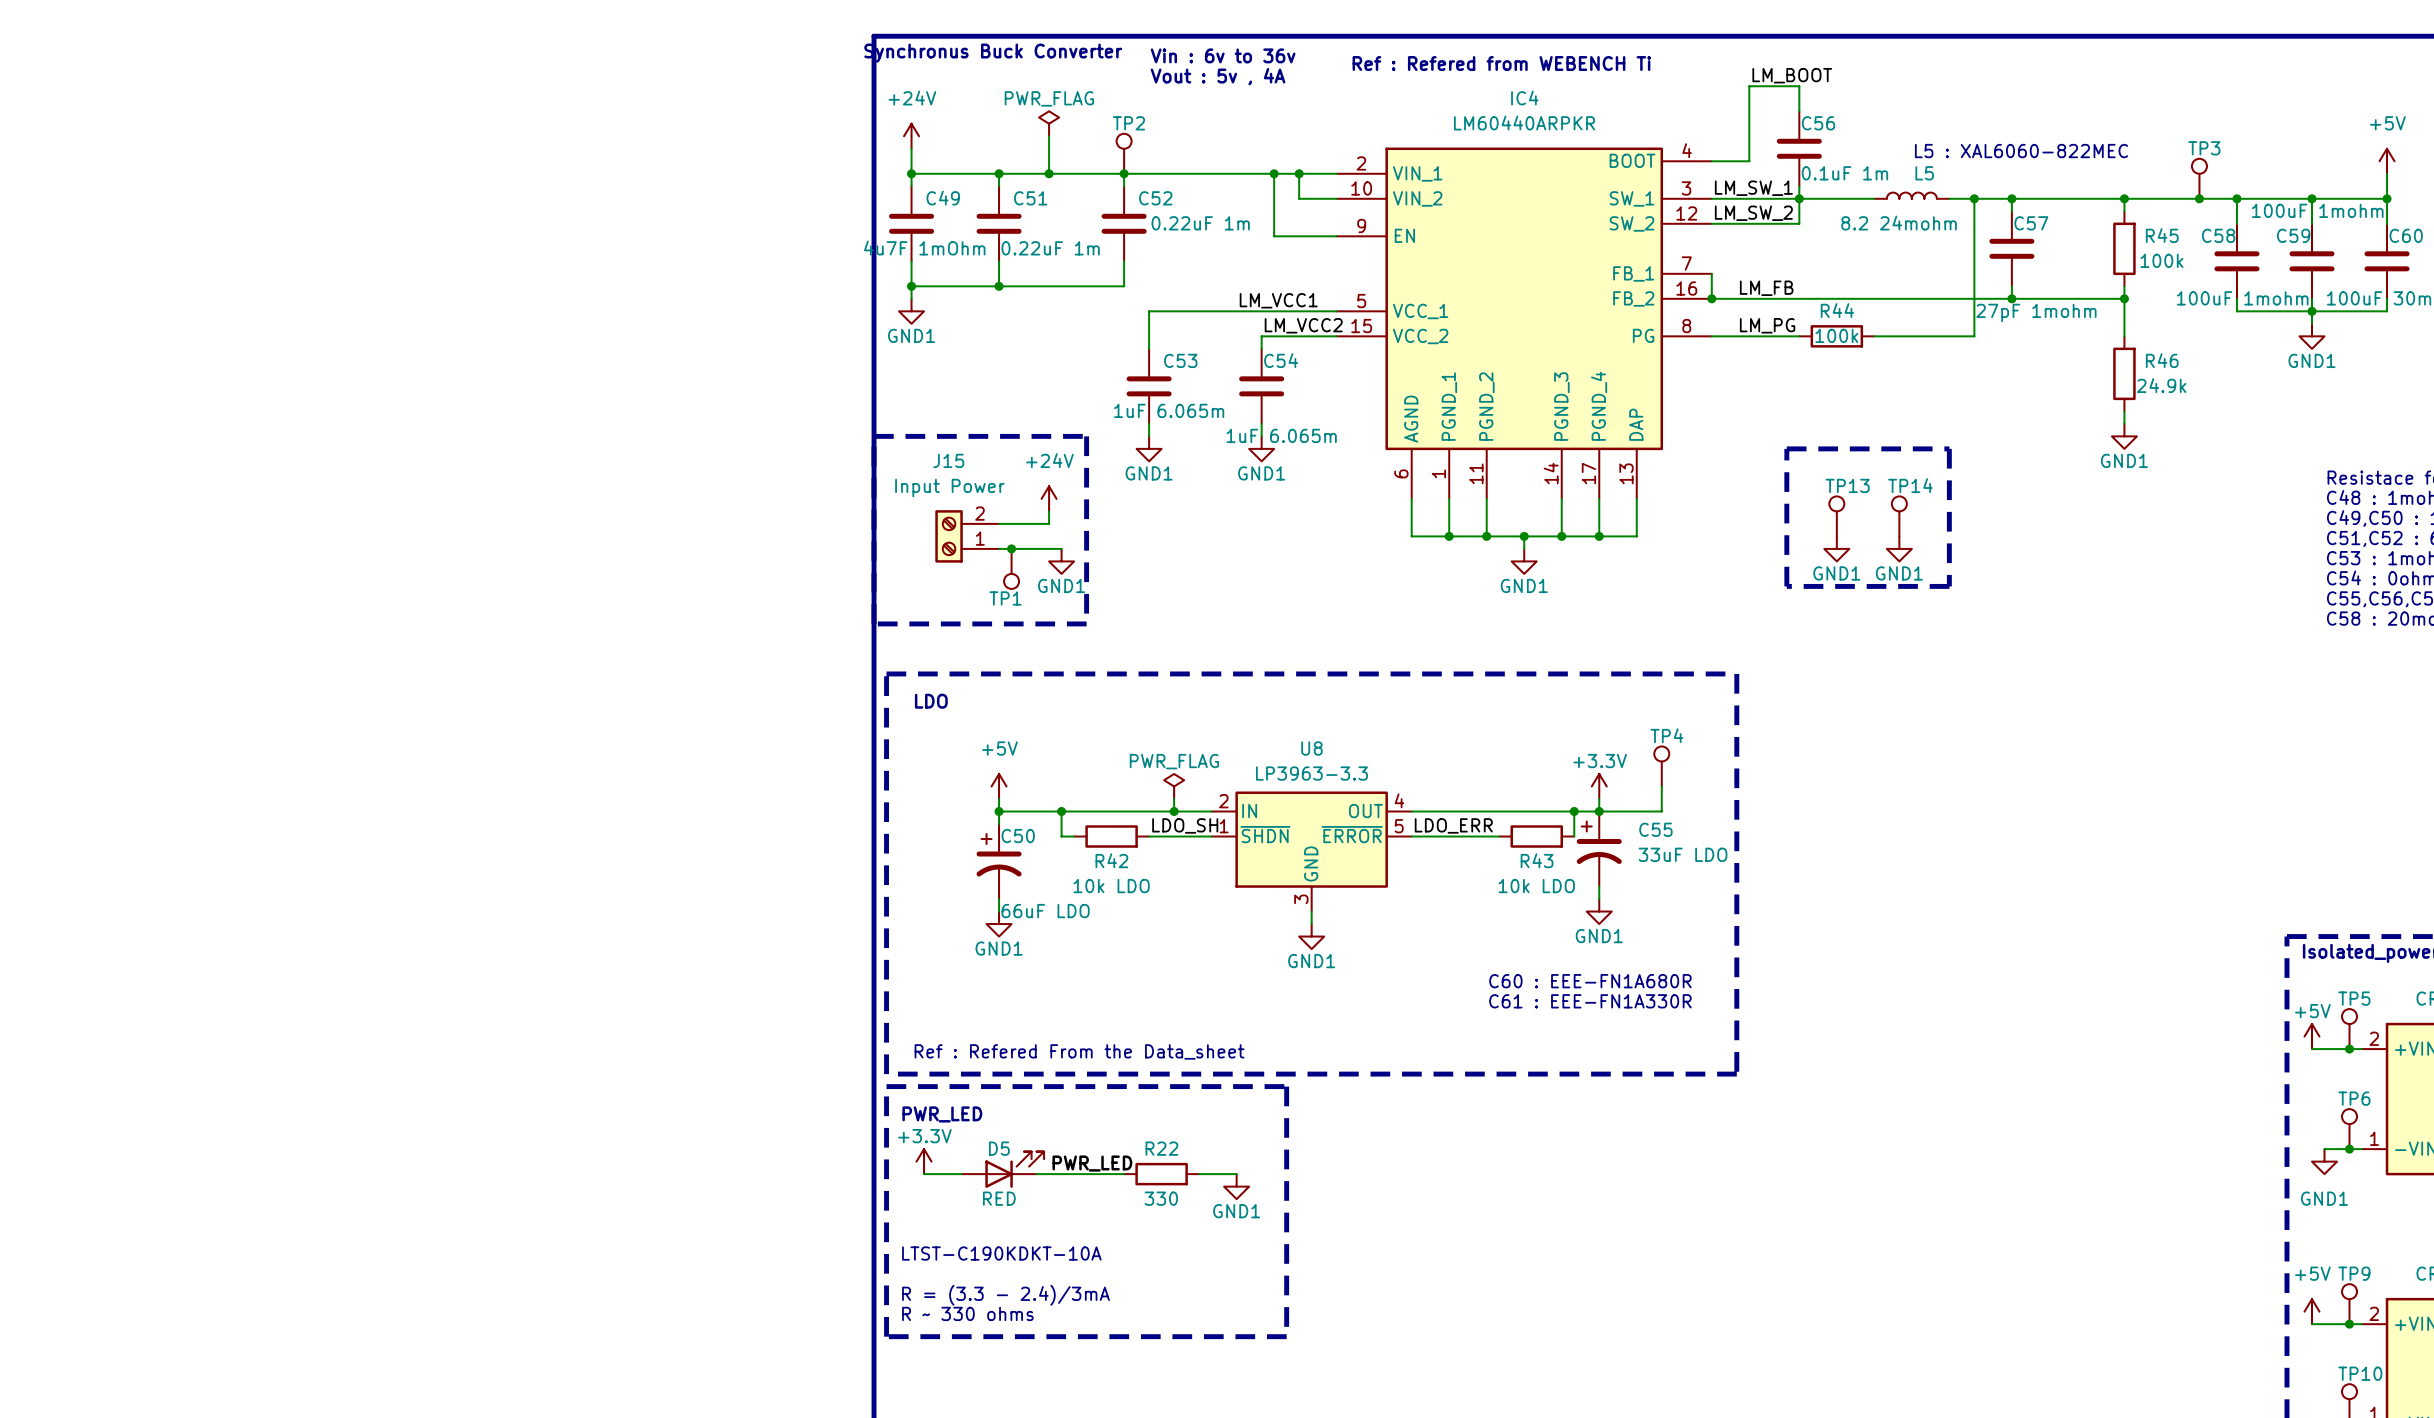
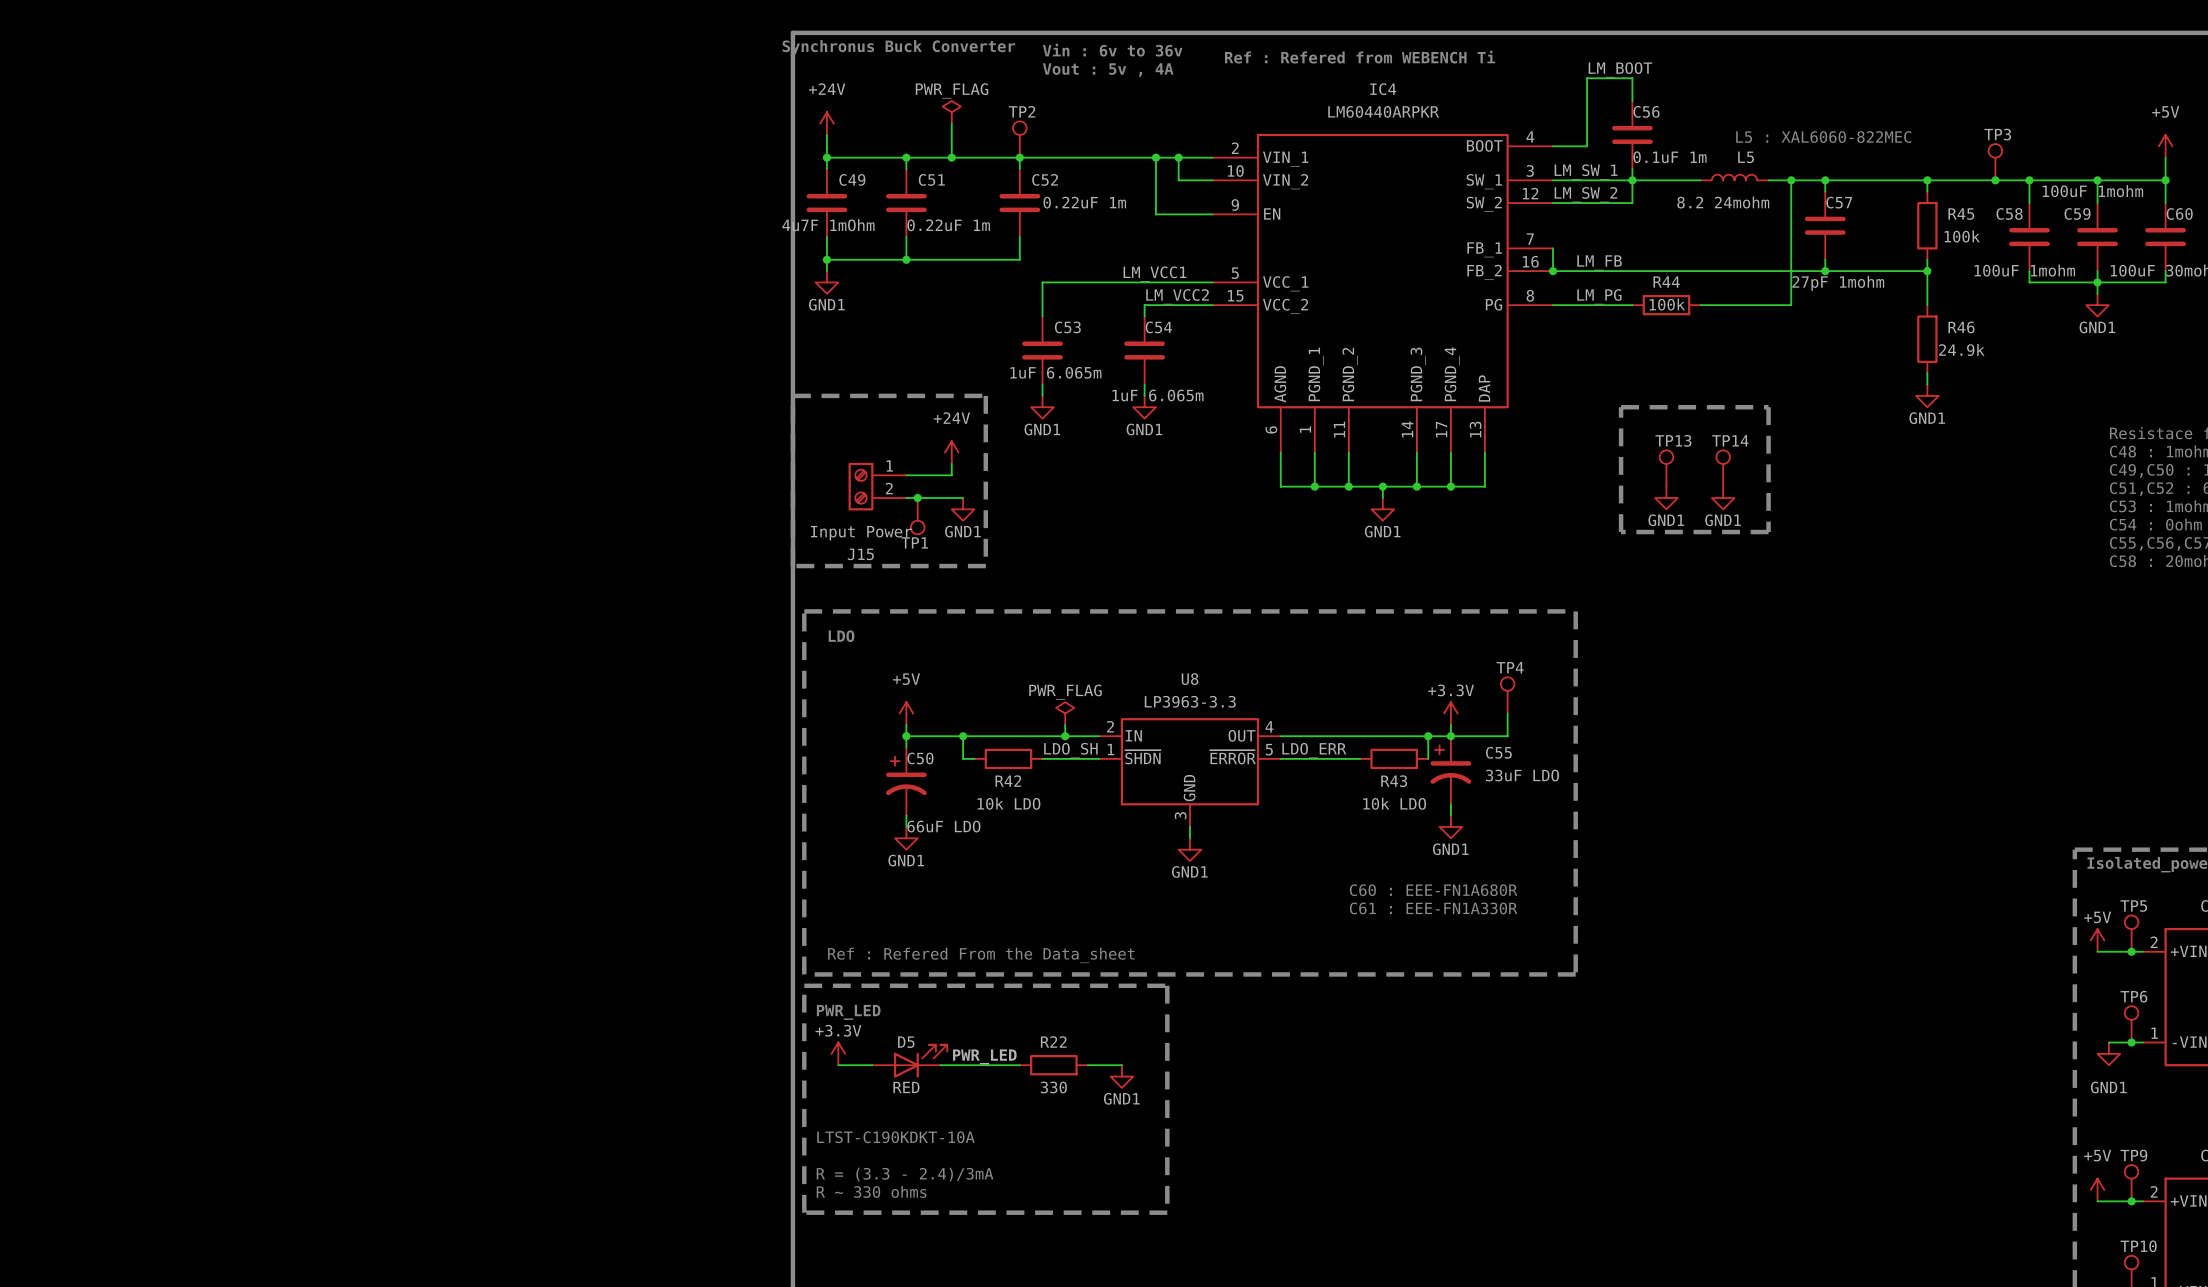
J15 flip: as is (949, 536) -> up-down (861, 486)

